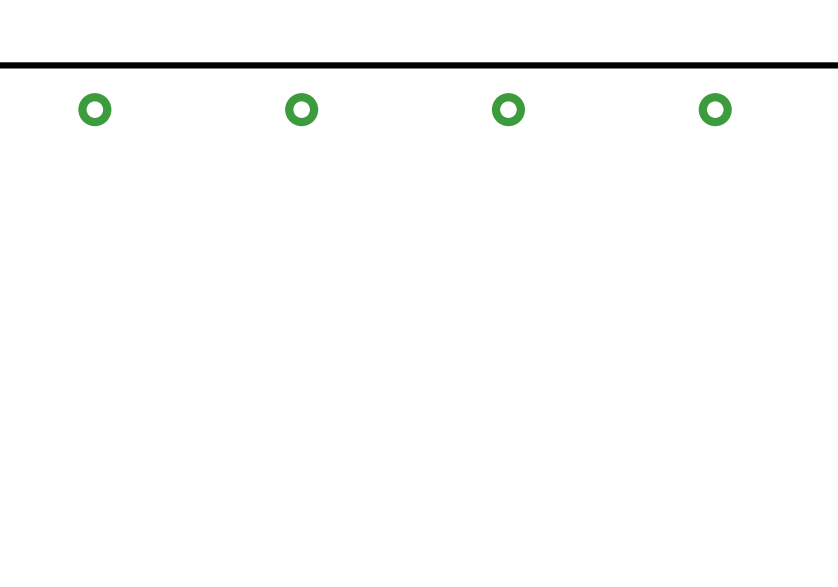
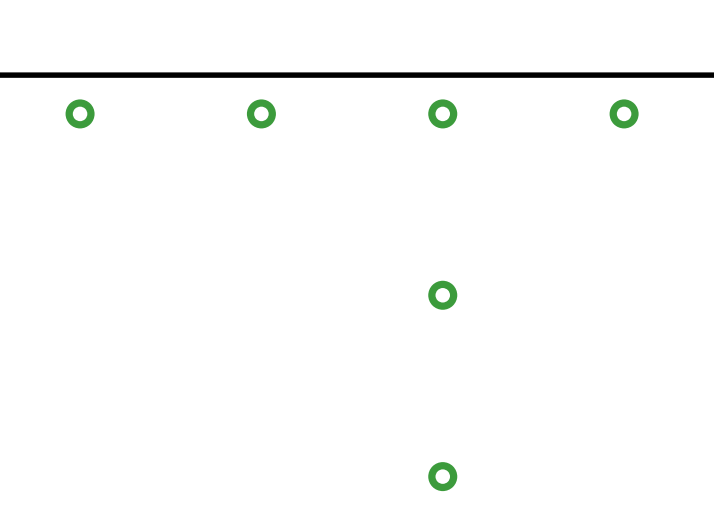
via: none -> (442, 295)
via: none -> (442, 476)

